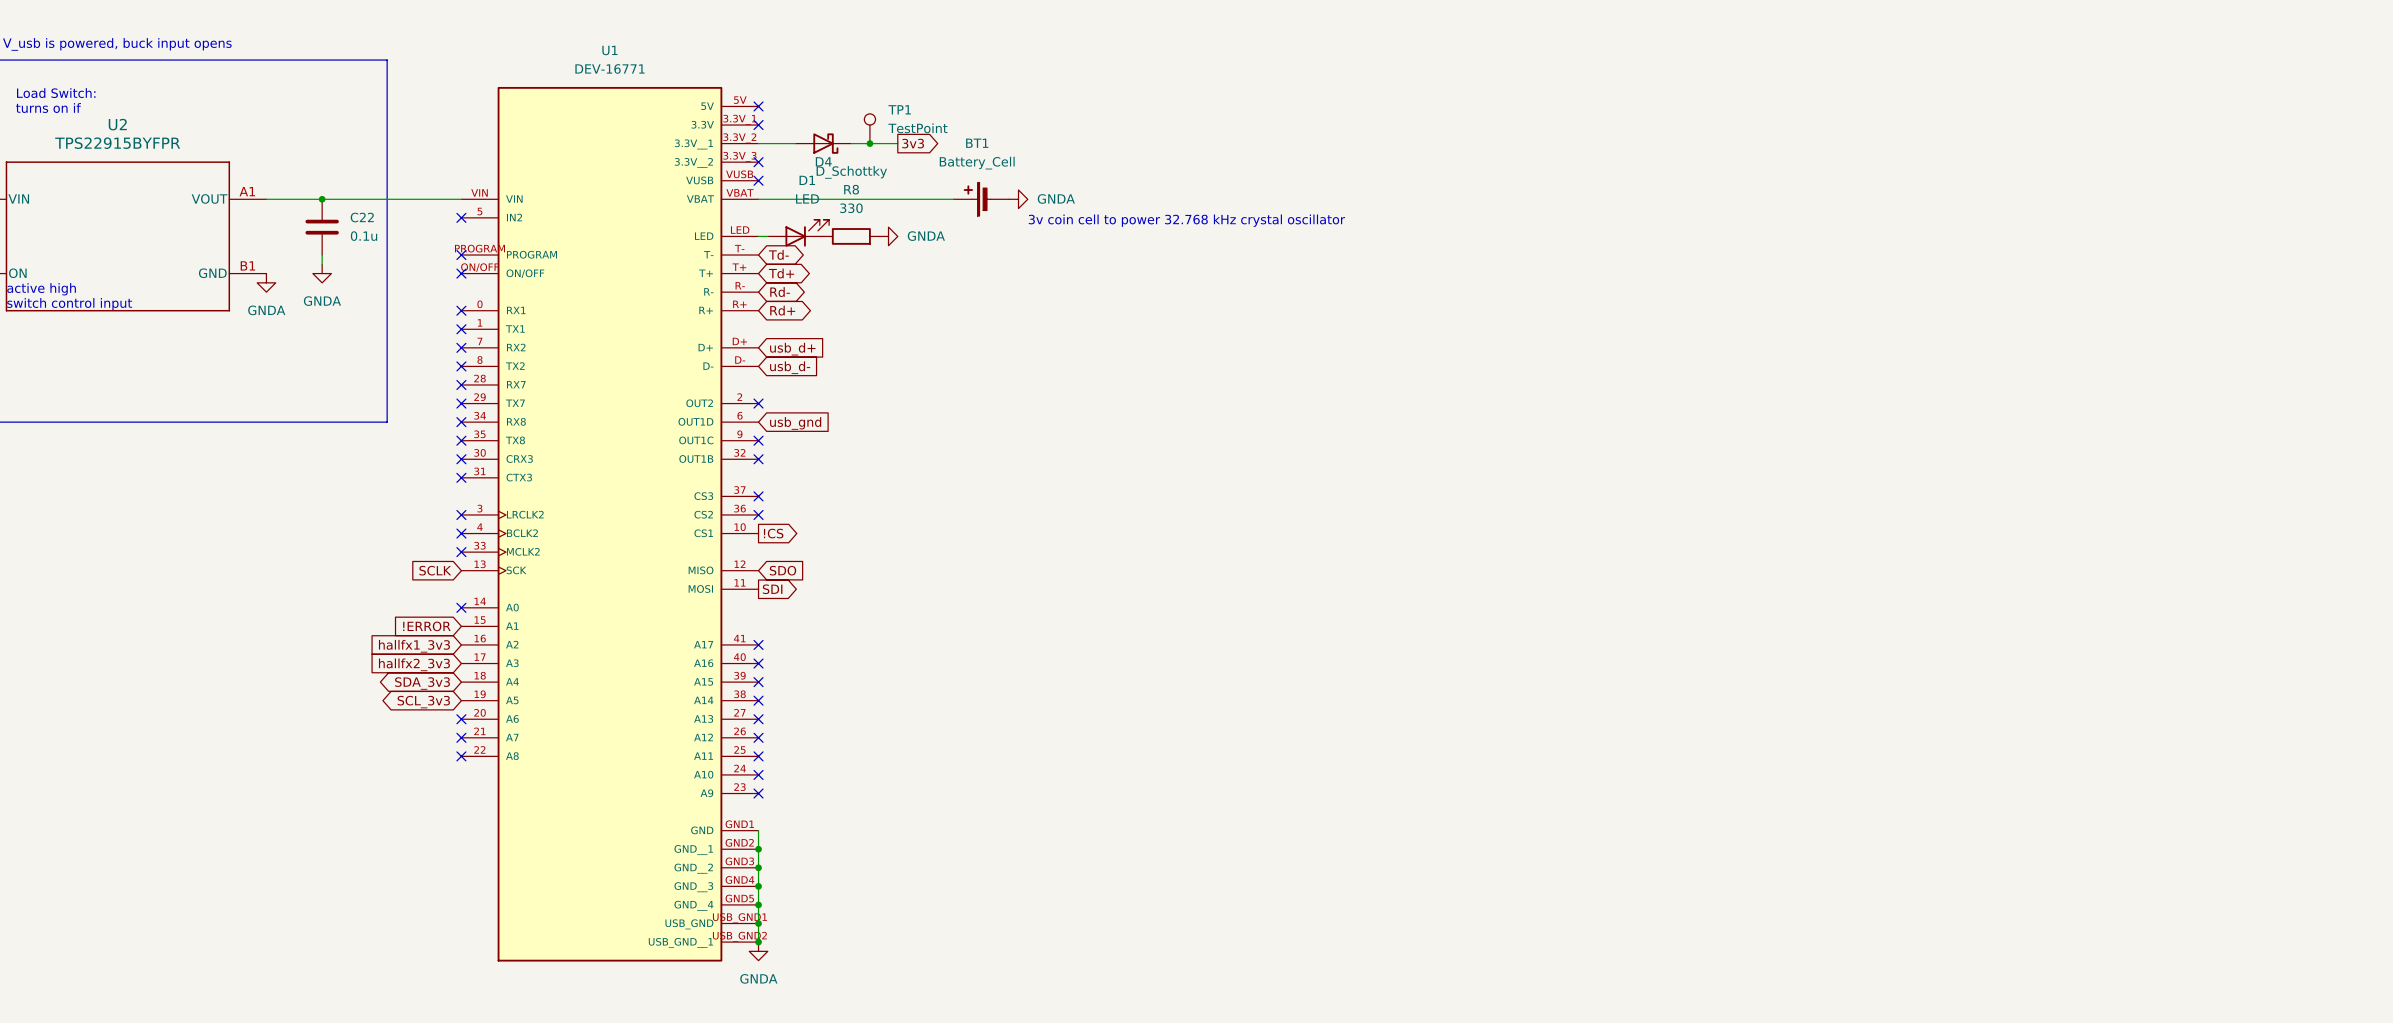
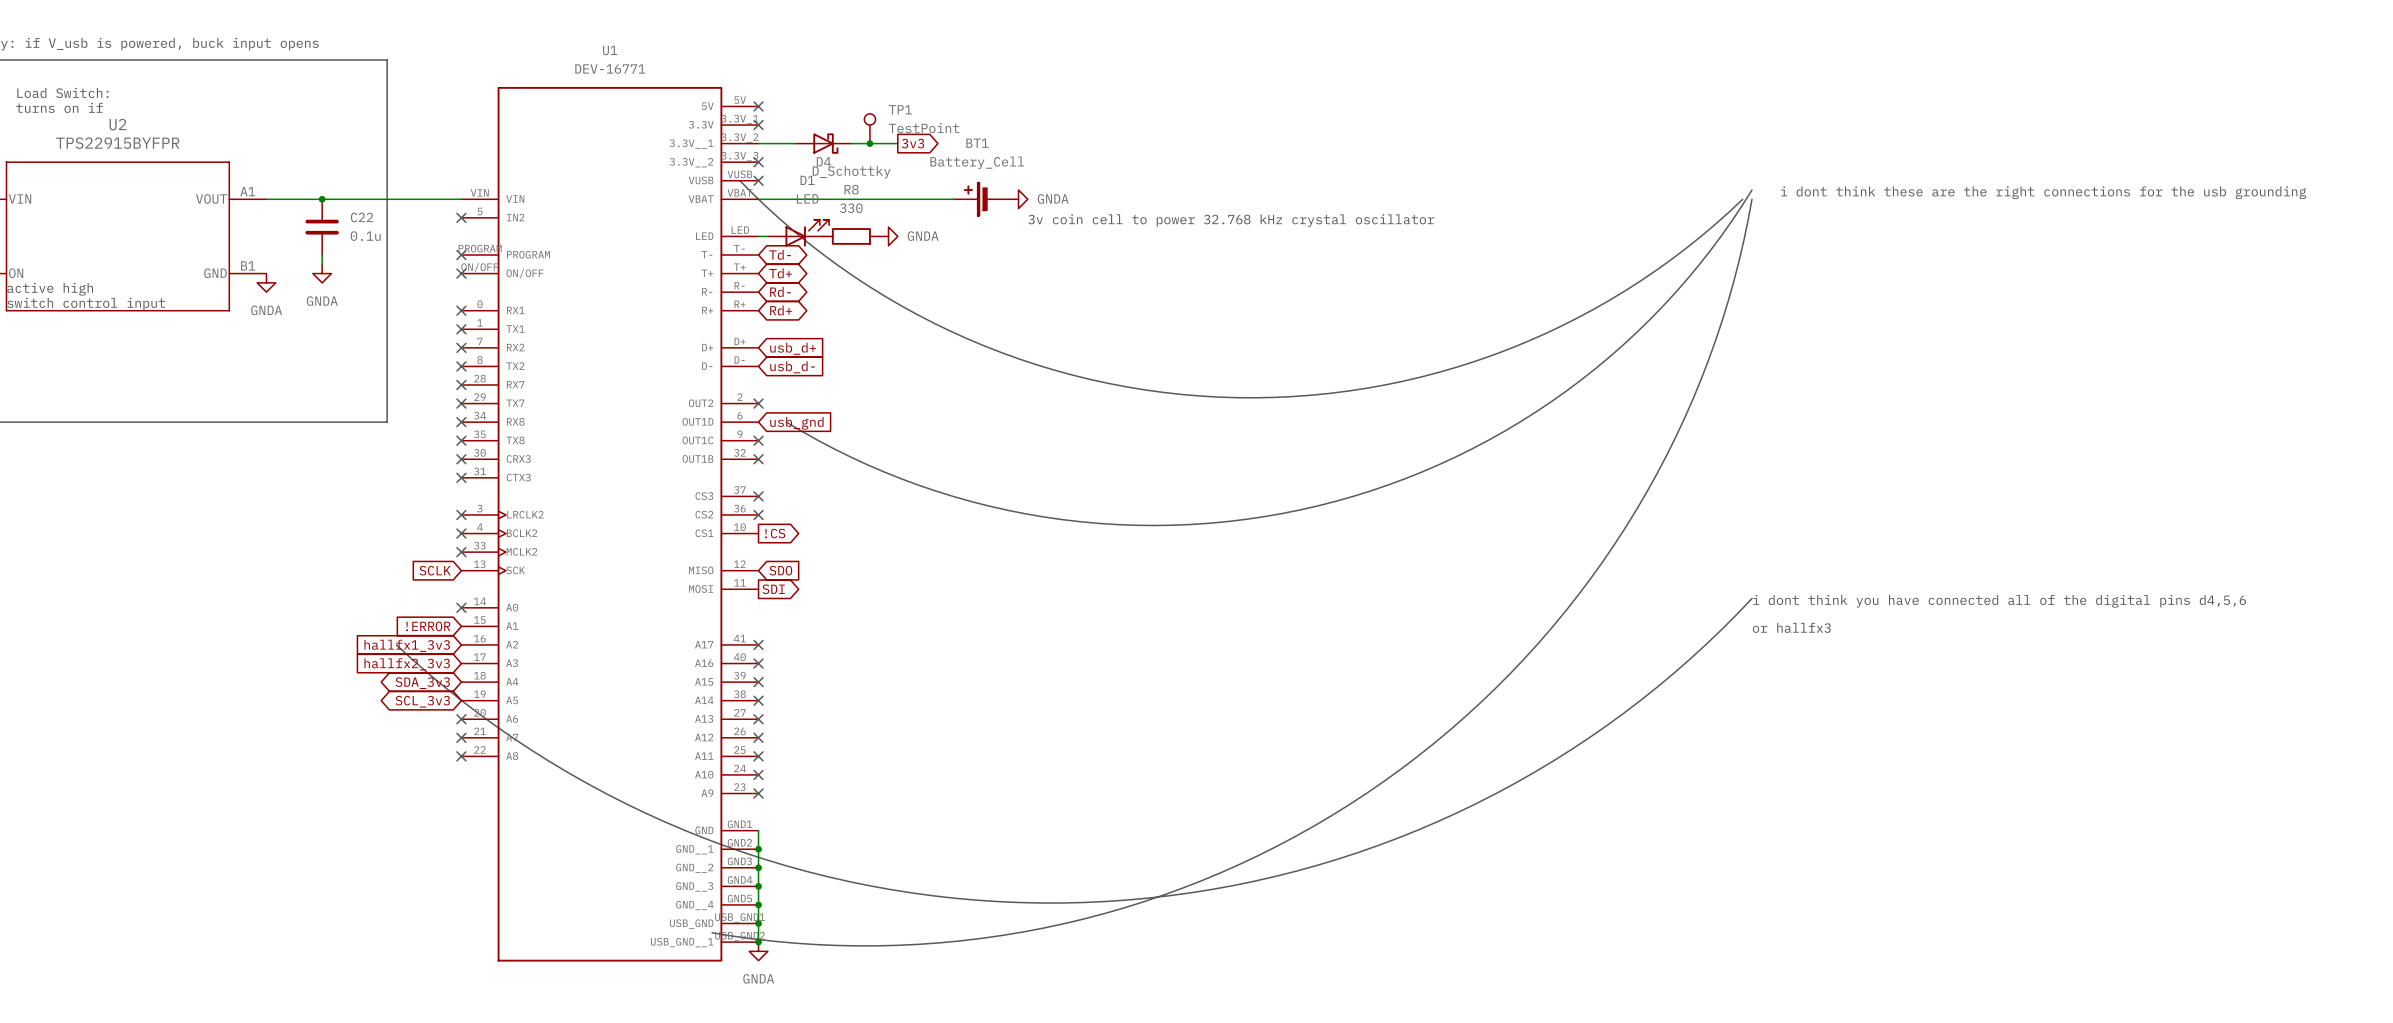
line: none -> (739, 180) (780, 219) (838, 265) (900, 305) (967, 338) (1019, 358) (1090, 379) (1163, 392) (1237, 397) (1293, 396) (1366, 388) (1439, 372) (1509, 348) (1560, 326) (1625, 290) (1686, 247) (1742, 199)
line: none -> (1751, 190) (1721, 235) (1675, 293) (1623, 344) (1566, 391) (1504, 431) (1455, 457) (1387, 485) (1317, 506) (1244, 519) (1171, 525) (1098, 523) (1043, 516) (971, 501) (918, 485) (850, 457) (786, 422)
text: none -> i dont think these are the right connections for the usb grounding (2043, 192)
line: none -> (1751, 199) (1734, 280) (1708, 359) (1676, 436) (1625, 526) (1578, 595) (1524, 658) (1465, 716) (1383, 781) (1313, 826) (1240, 864) (1162, 895) (1063, 923) (981, 938) (877, 945) (794, 943) (712, 932)
line: none -> (1751, 598) (1674, 672) (1606, 725) (1534, 772) (1438, 821) (1337, 859) (1254, 881) (1169, 895) (1083, 902) (997, 901) (890, 889) (786, 865) (704, 838) (606, 793) (532, 750) (461, 700) (396, 644)
text: none -> i dont think you have connected all of the digital pins d4,5,6 (1999, 601)
text: none -> or hallfx3 (1791, 627)

